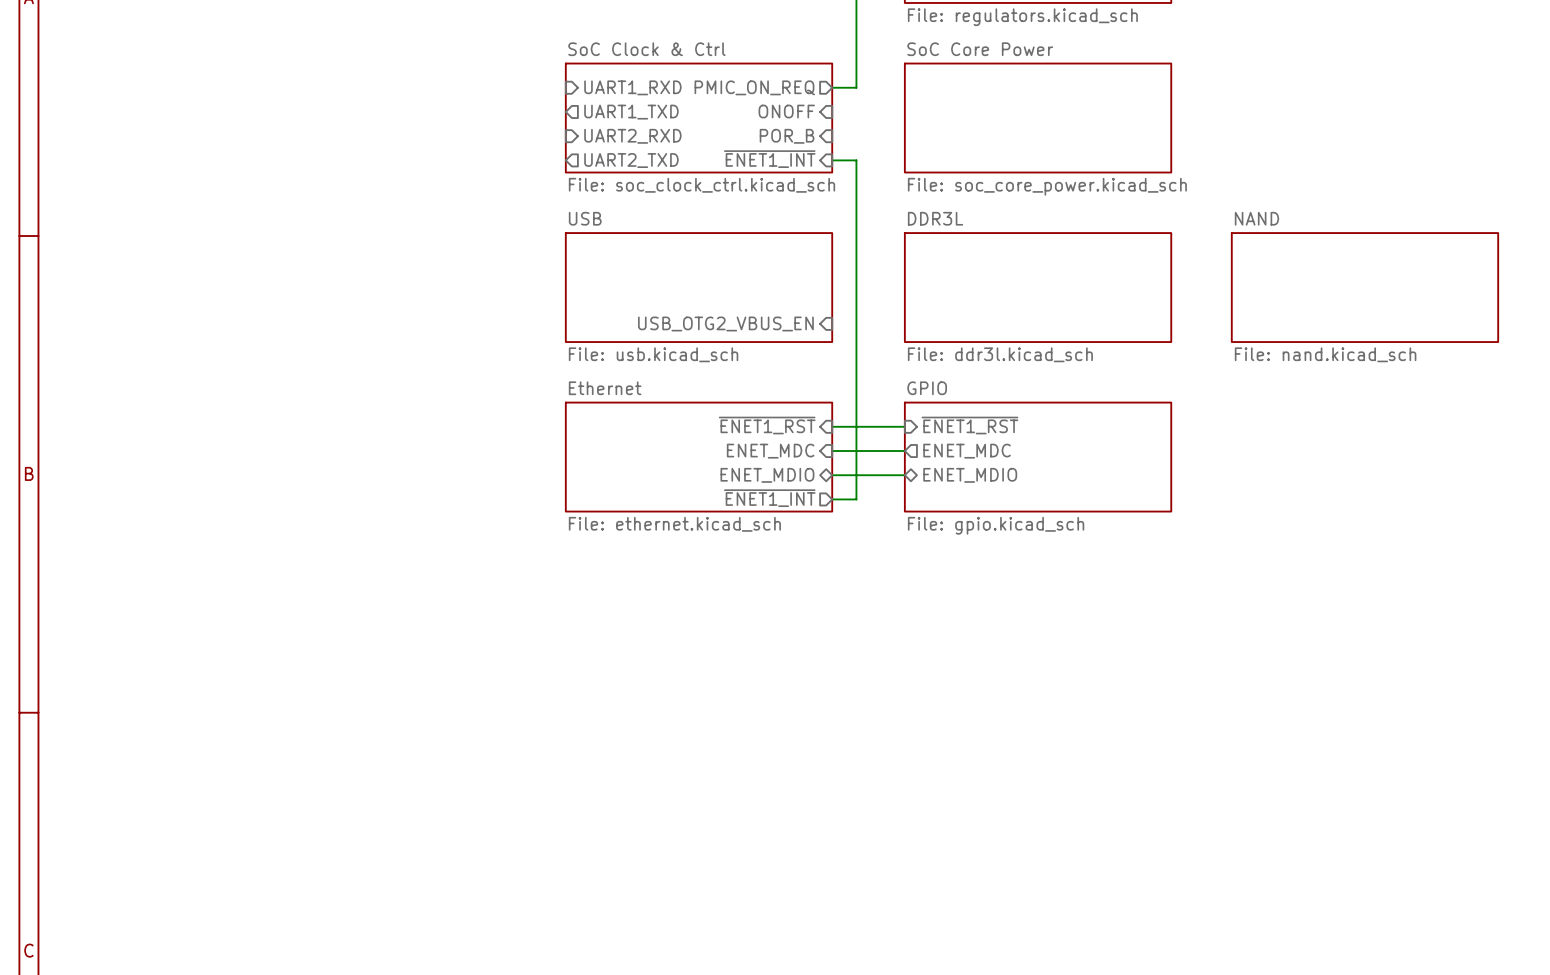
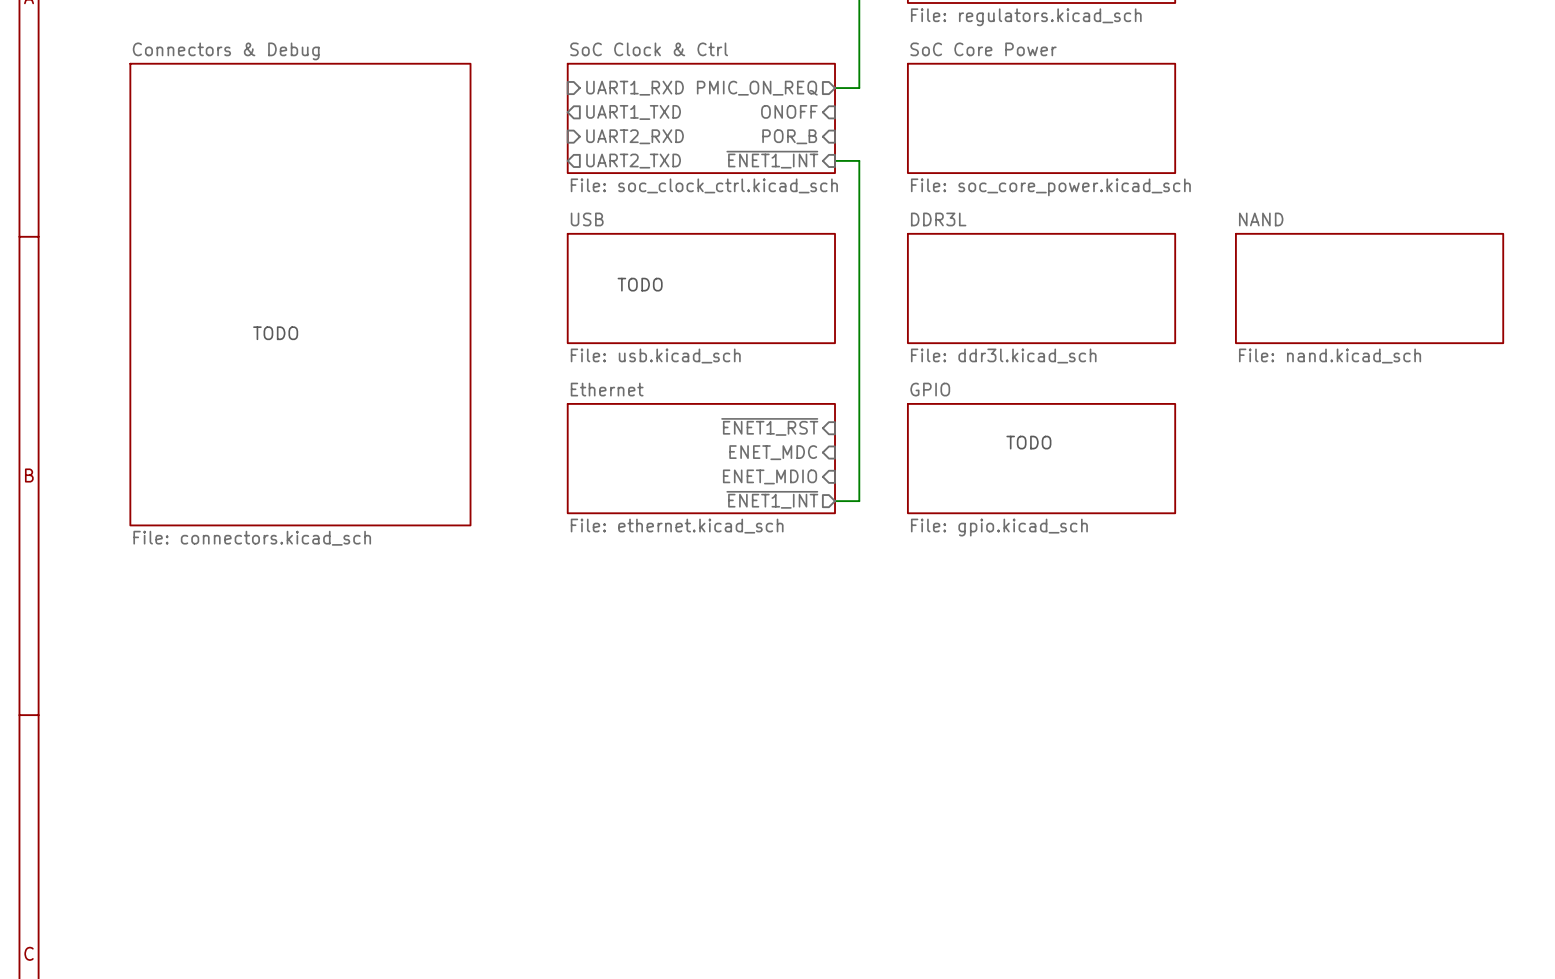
text: none -> TODO (640, 284)
sheet Connectors & Debug: none -> File: connectors.kicad_sch (300, 294)
sheet pin: USB_OTG2_VBUS_EN (725, 323) -> none
text: none -> TODO (275, 333)
sheet pin: ~{ENET1_RST} (969, 425) -> none
wire: (832, 426) (904, 426) -> none
text: none -> TODO (1028, 442)
wire: (832, 451) (904, 451) -> none
sheet pin: ENET_MDC (967, 451) -> none
sheet pin shape: bidirectional (767, 475) -> input (770, 476)
wire: (832, 475) (904, 475) -> none
sheet pin: ENET_MDIO (970, 475) -> none

